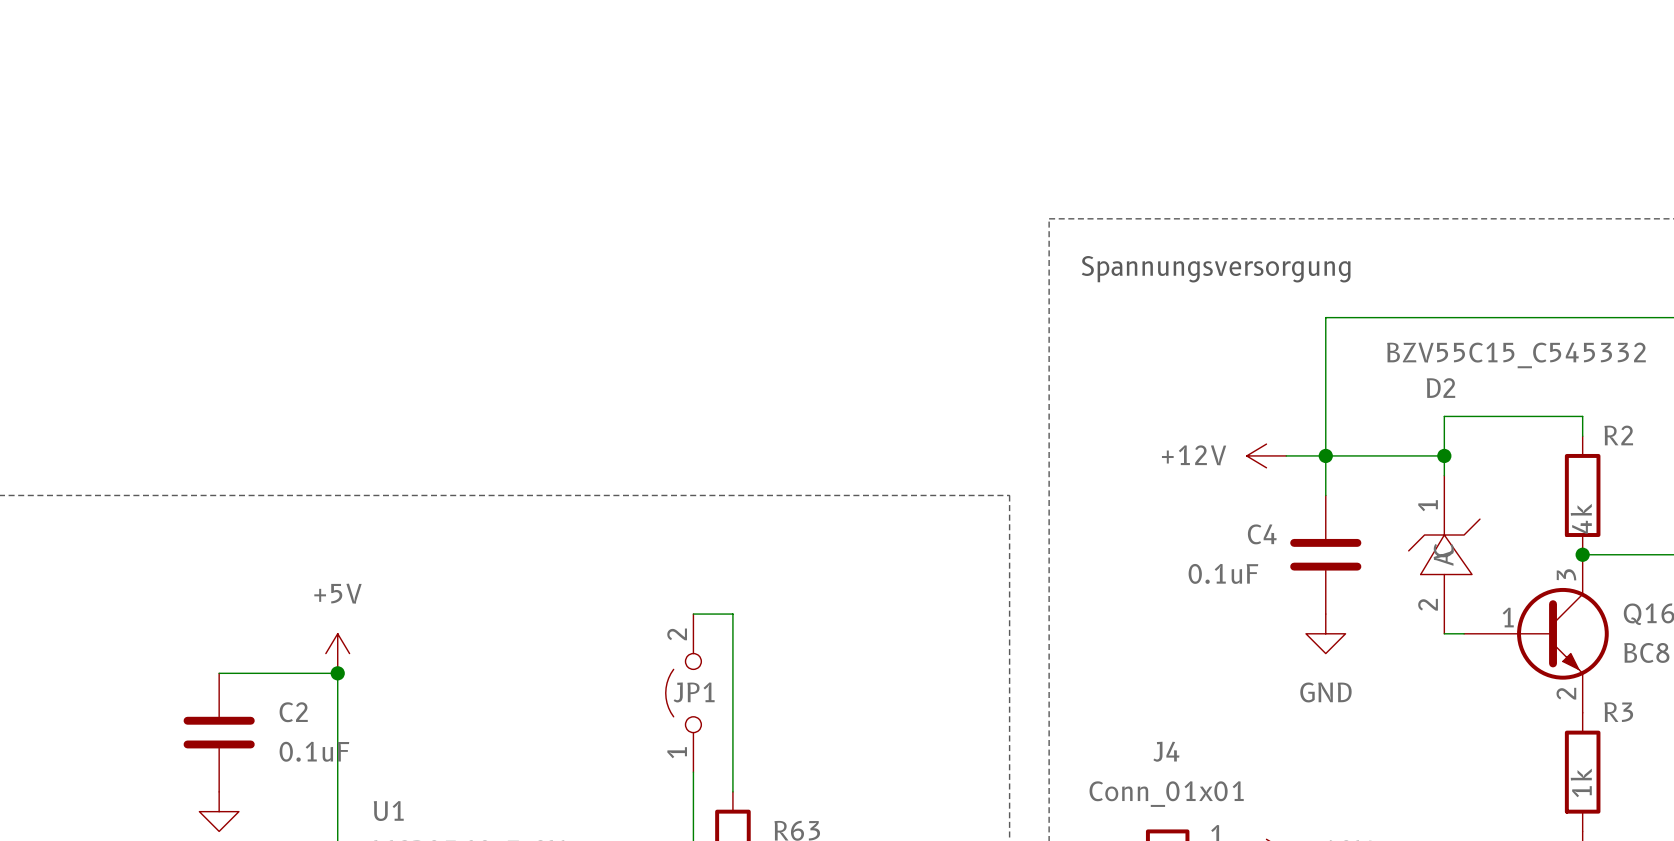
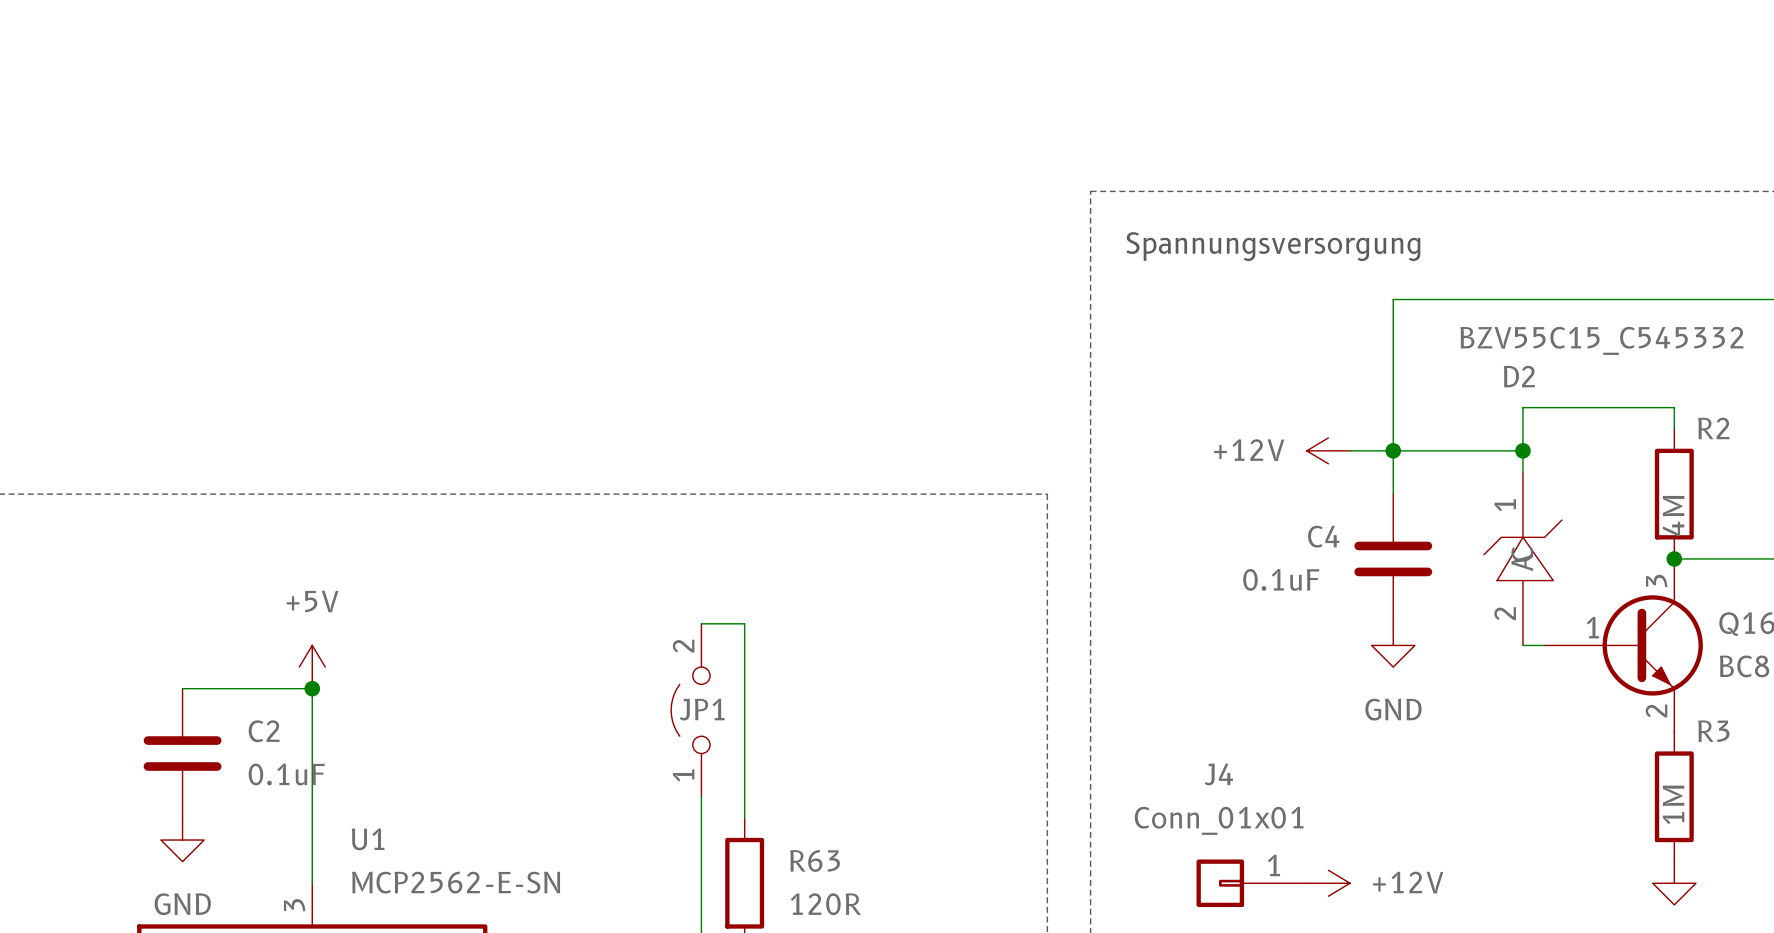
R2 value: 4k (1581, 518) -> 4M (1673, 515)
R3 value: 1k (1581, 782) -> 1M (1673, 804)

